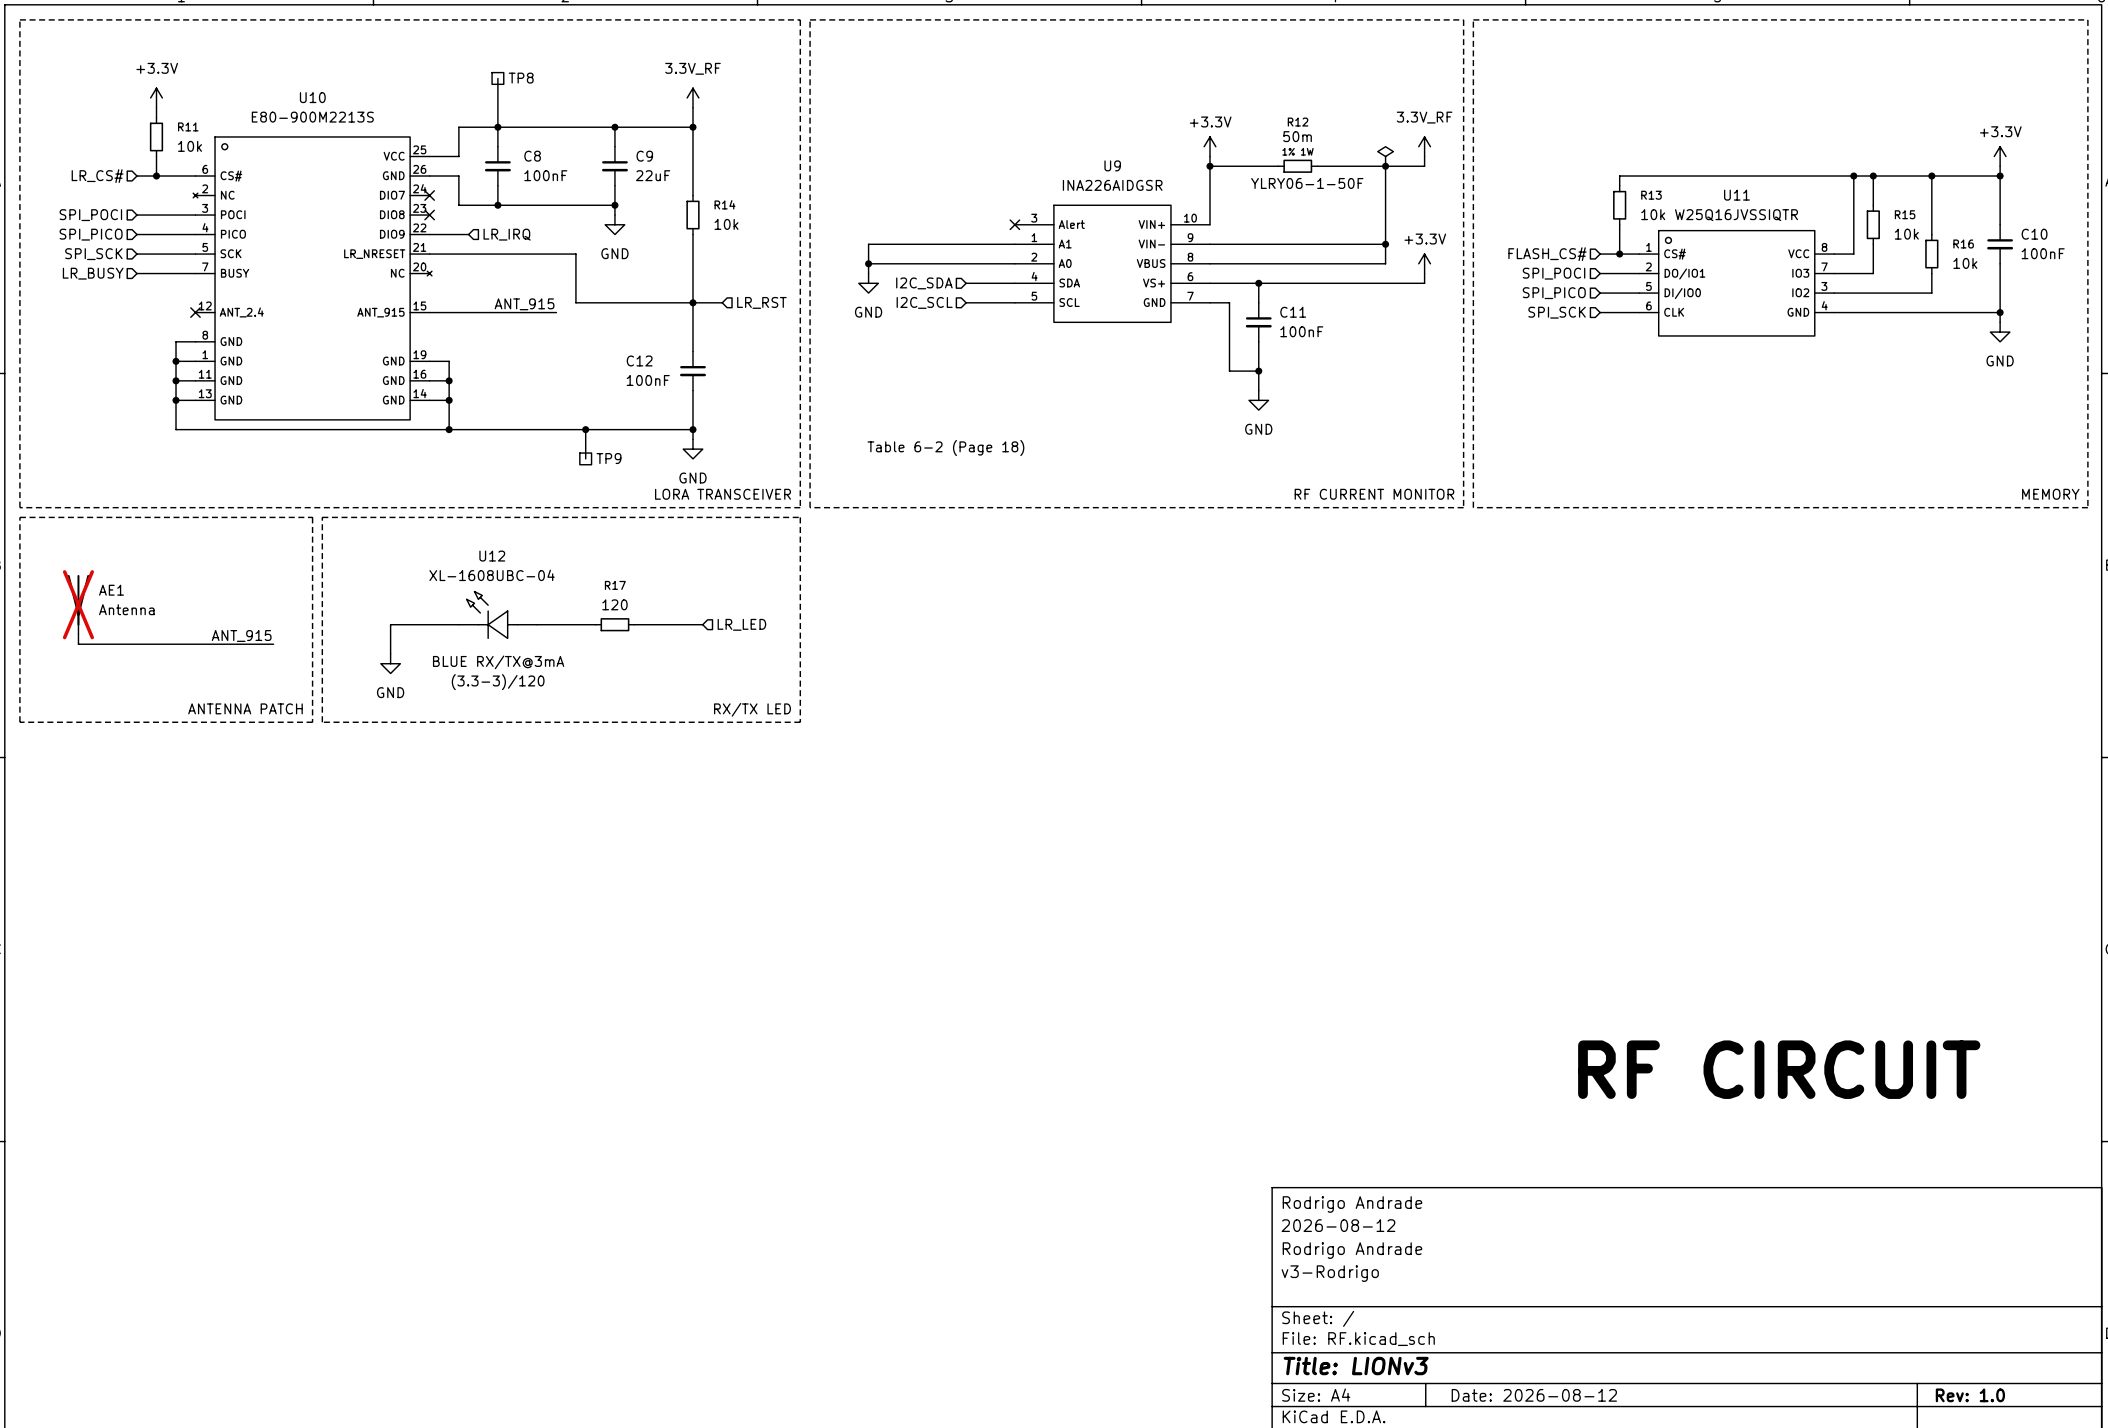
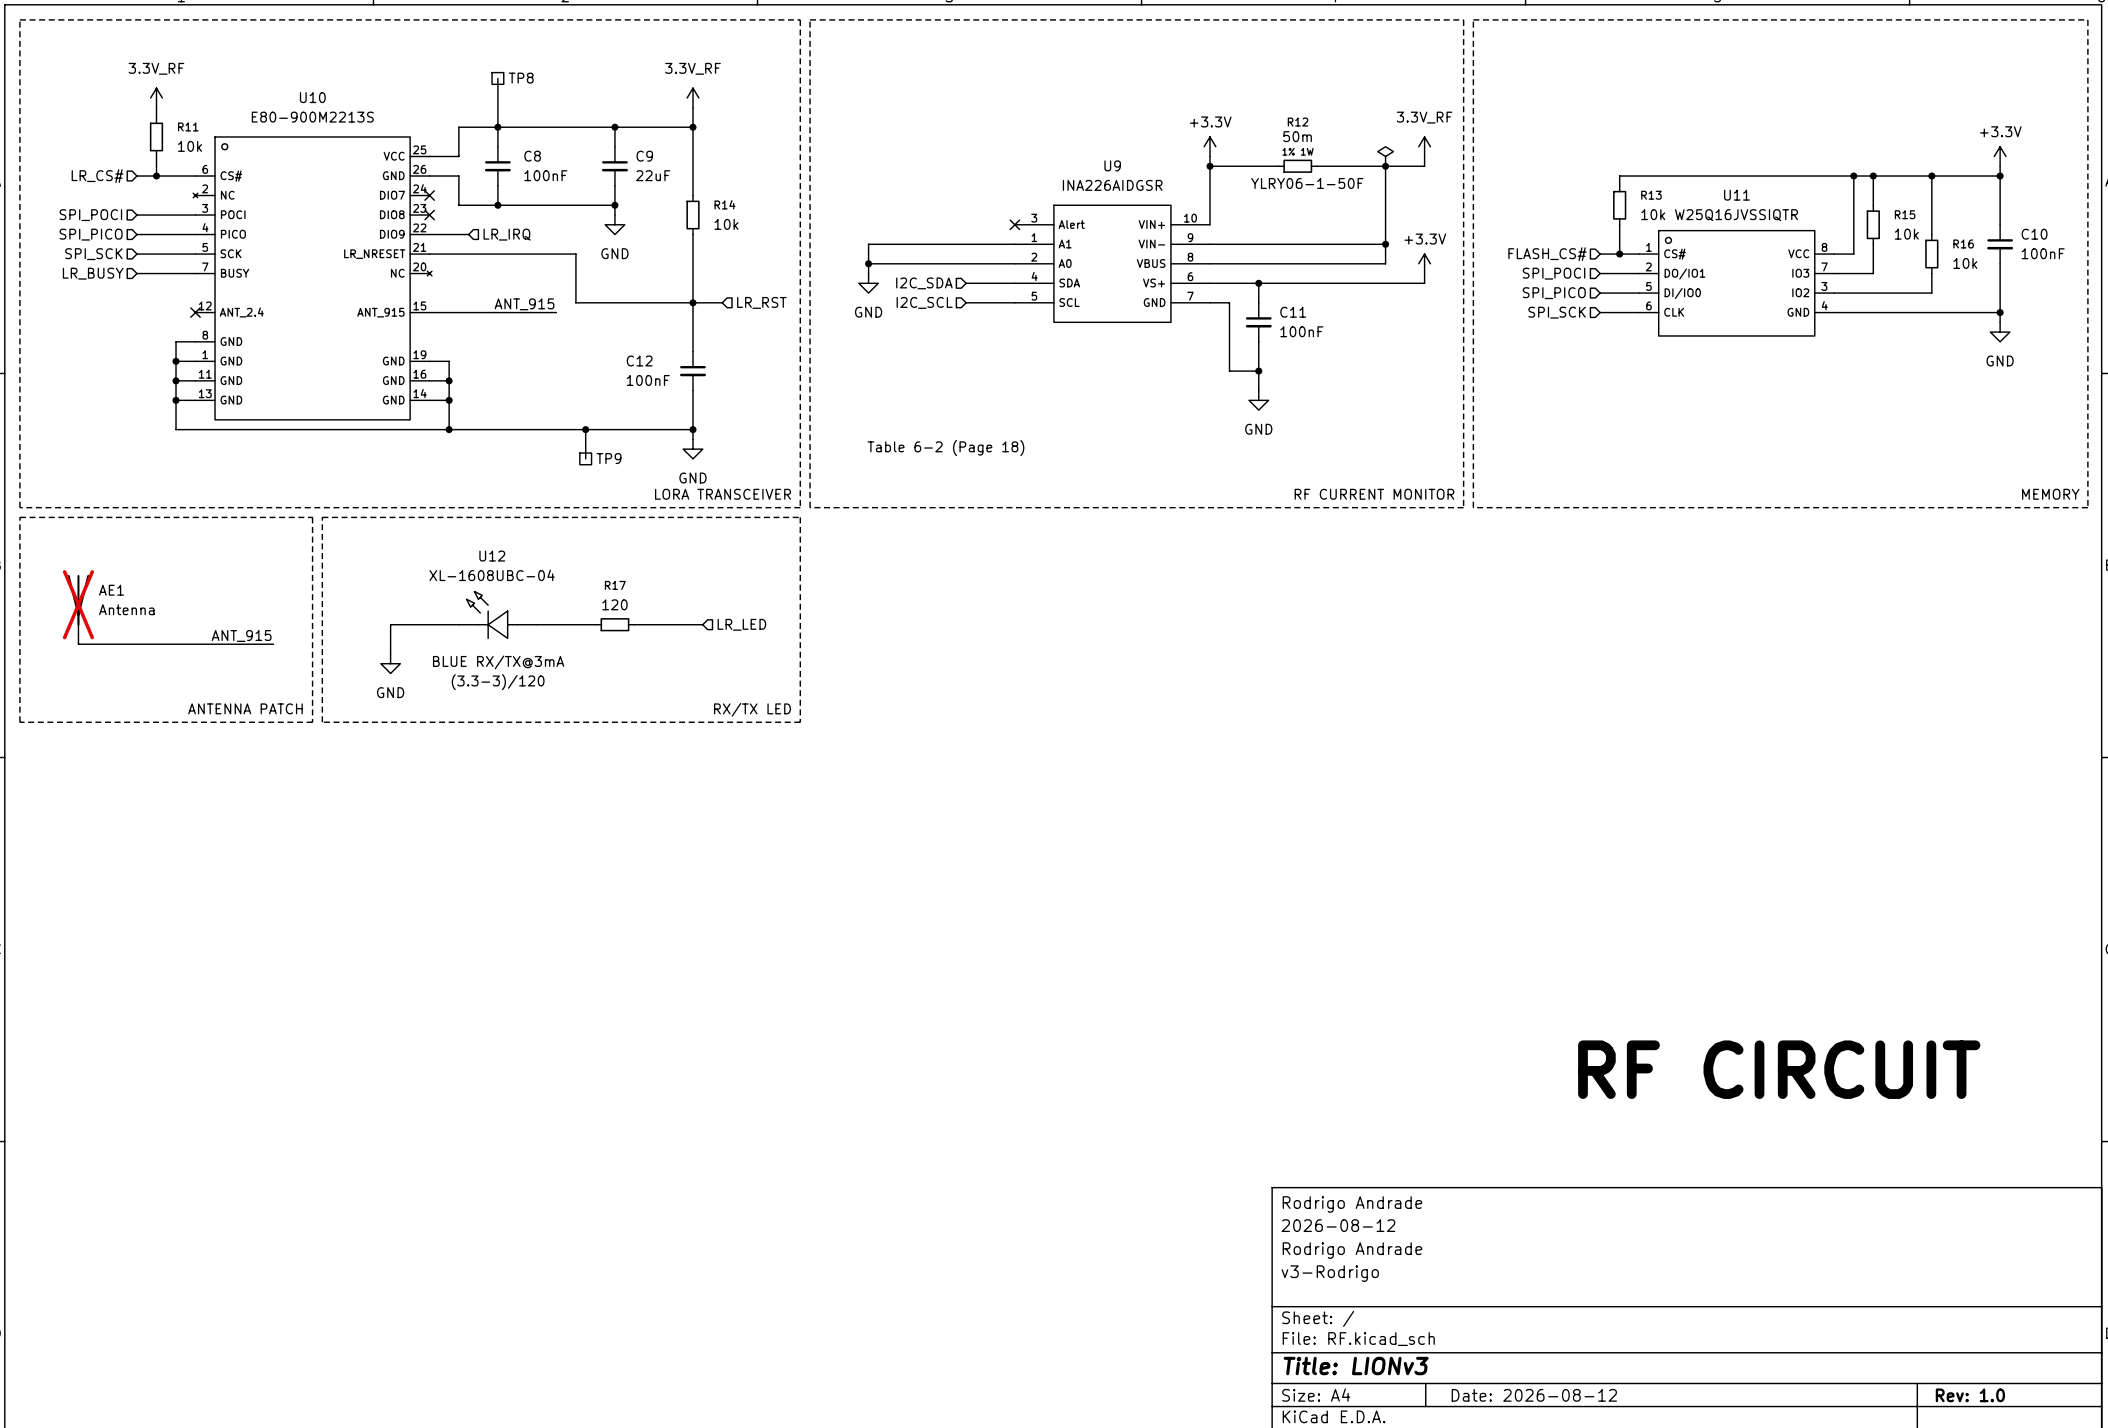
power symbol: +3.3V (156, 97) -> 3.3V_RF (156, 97)

